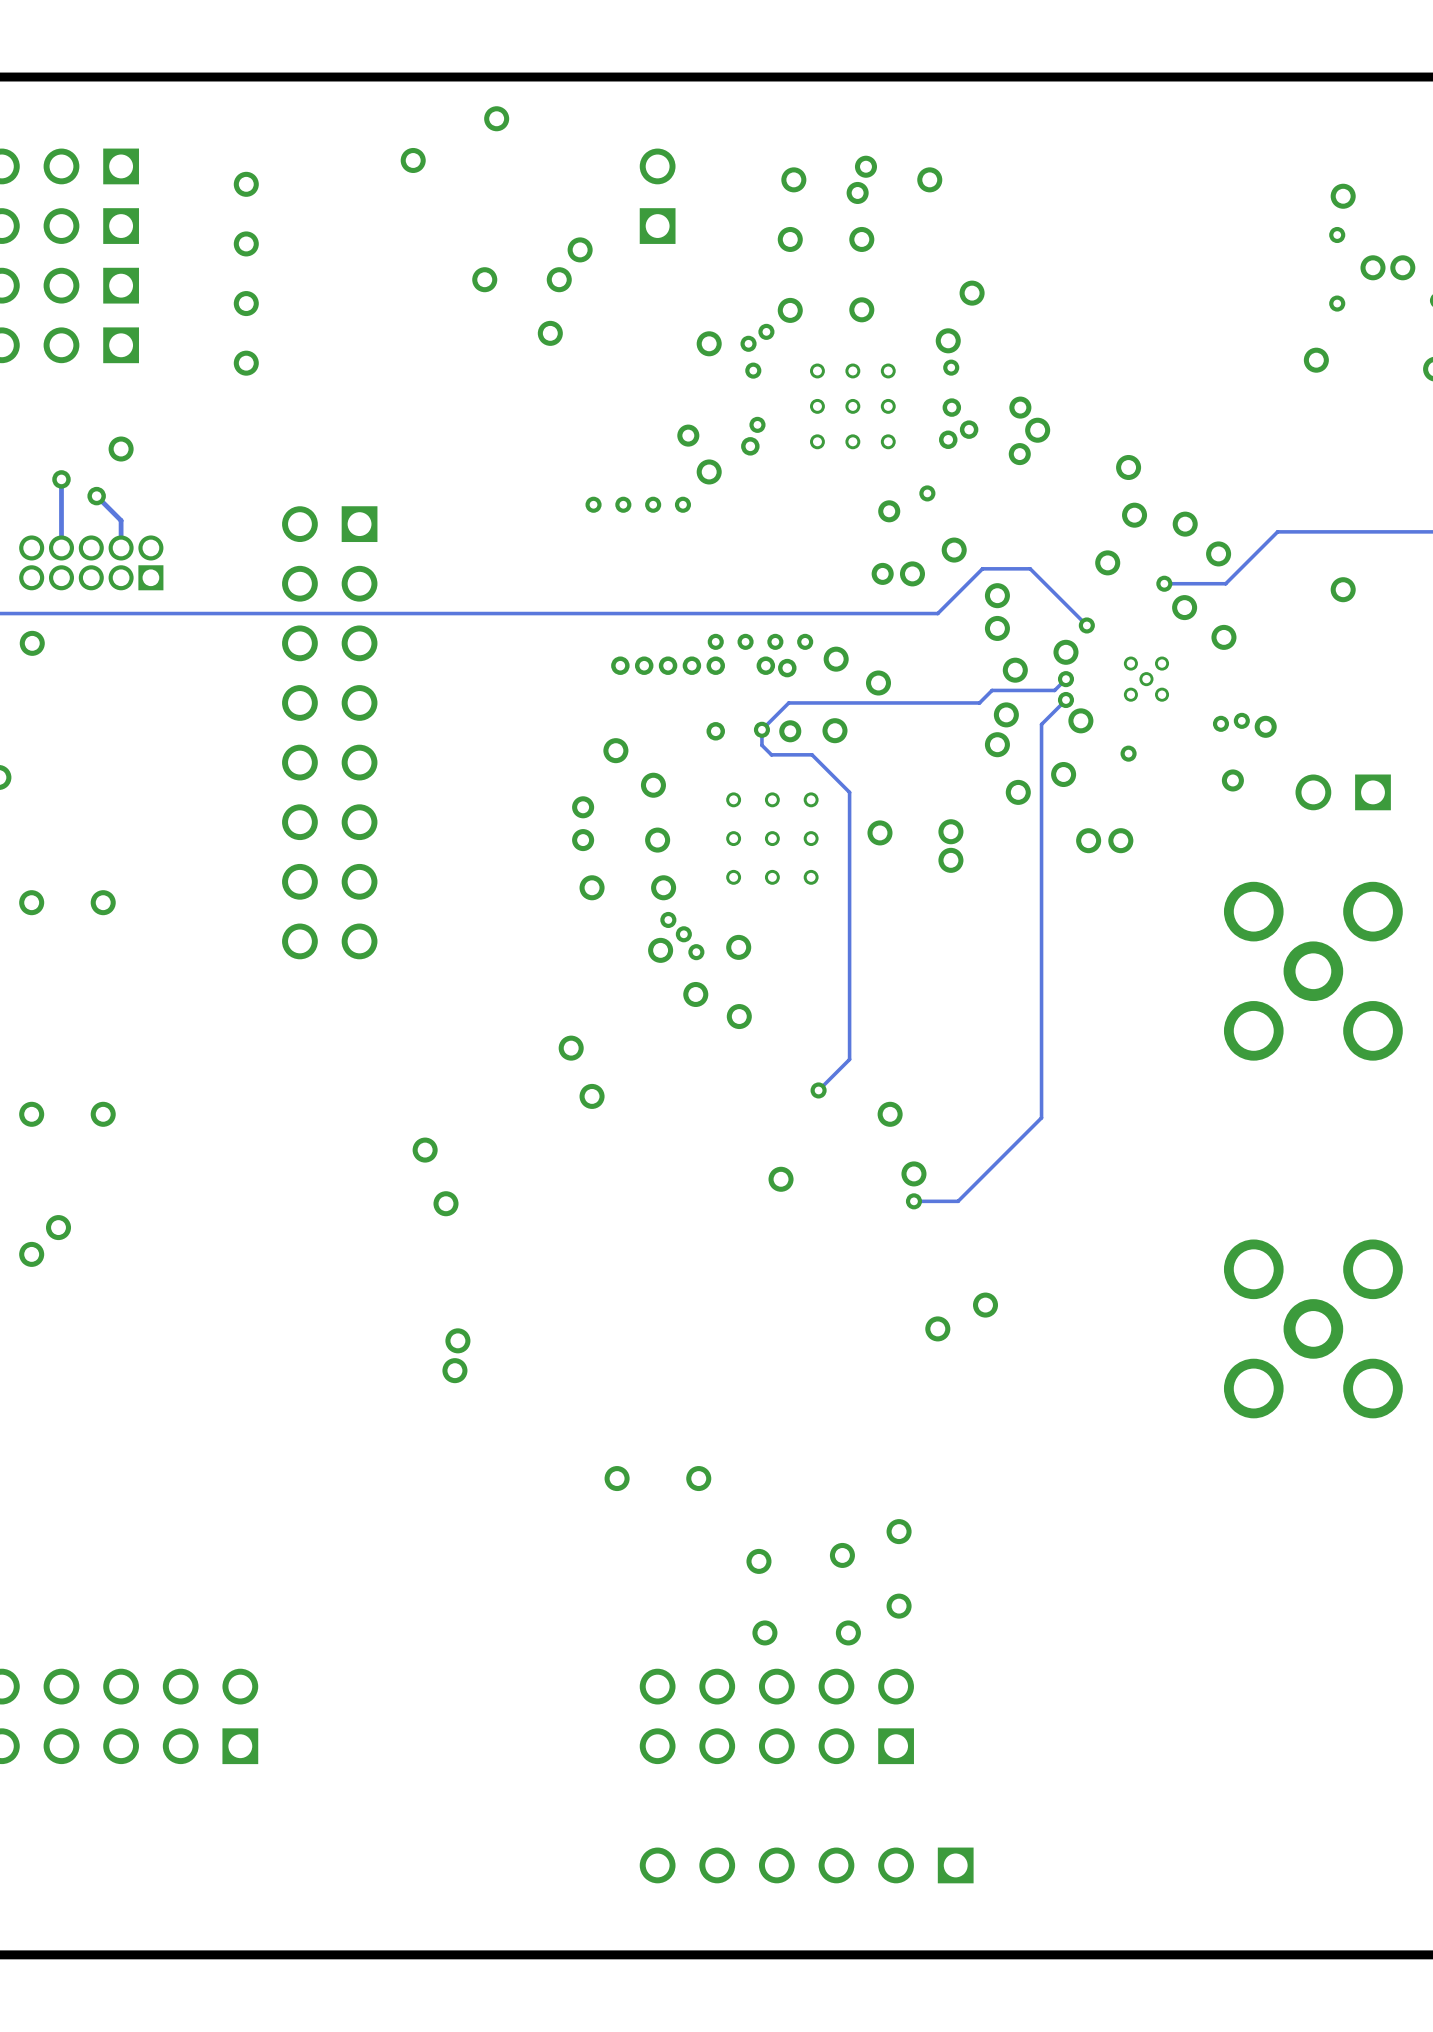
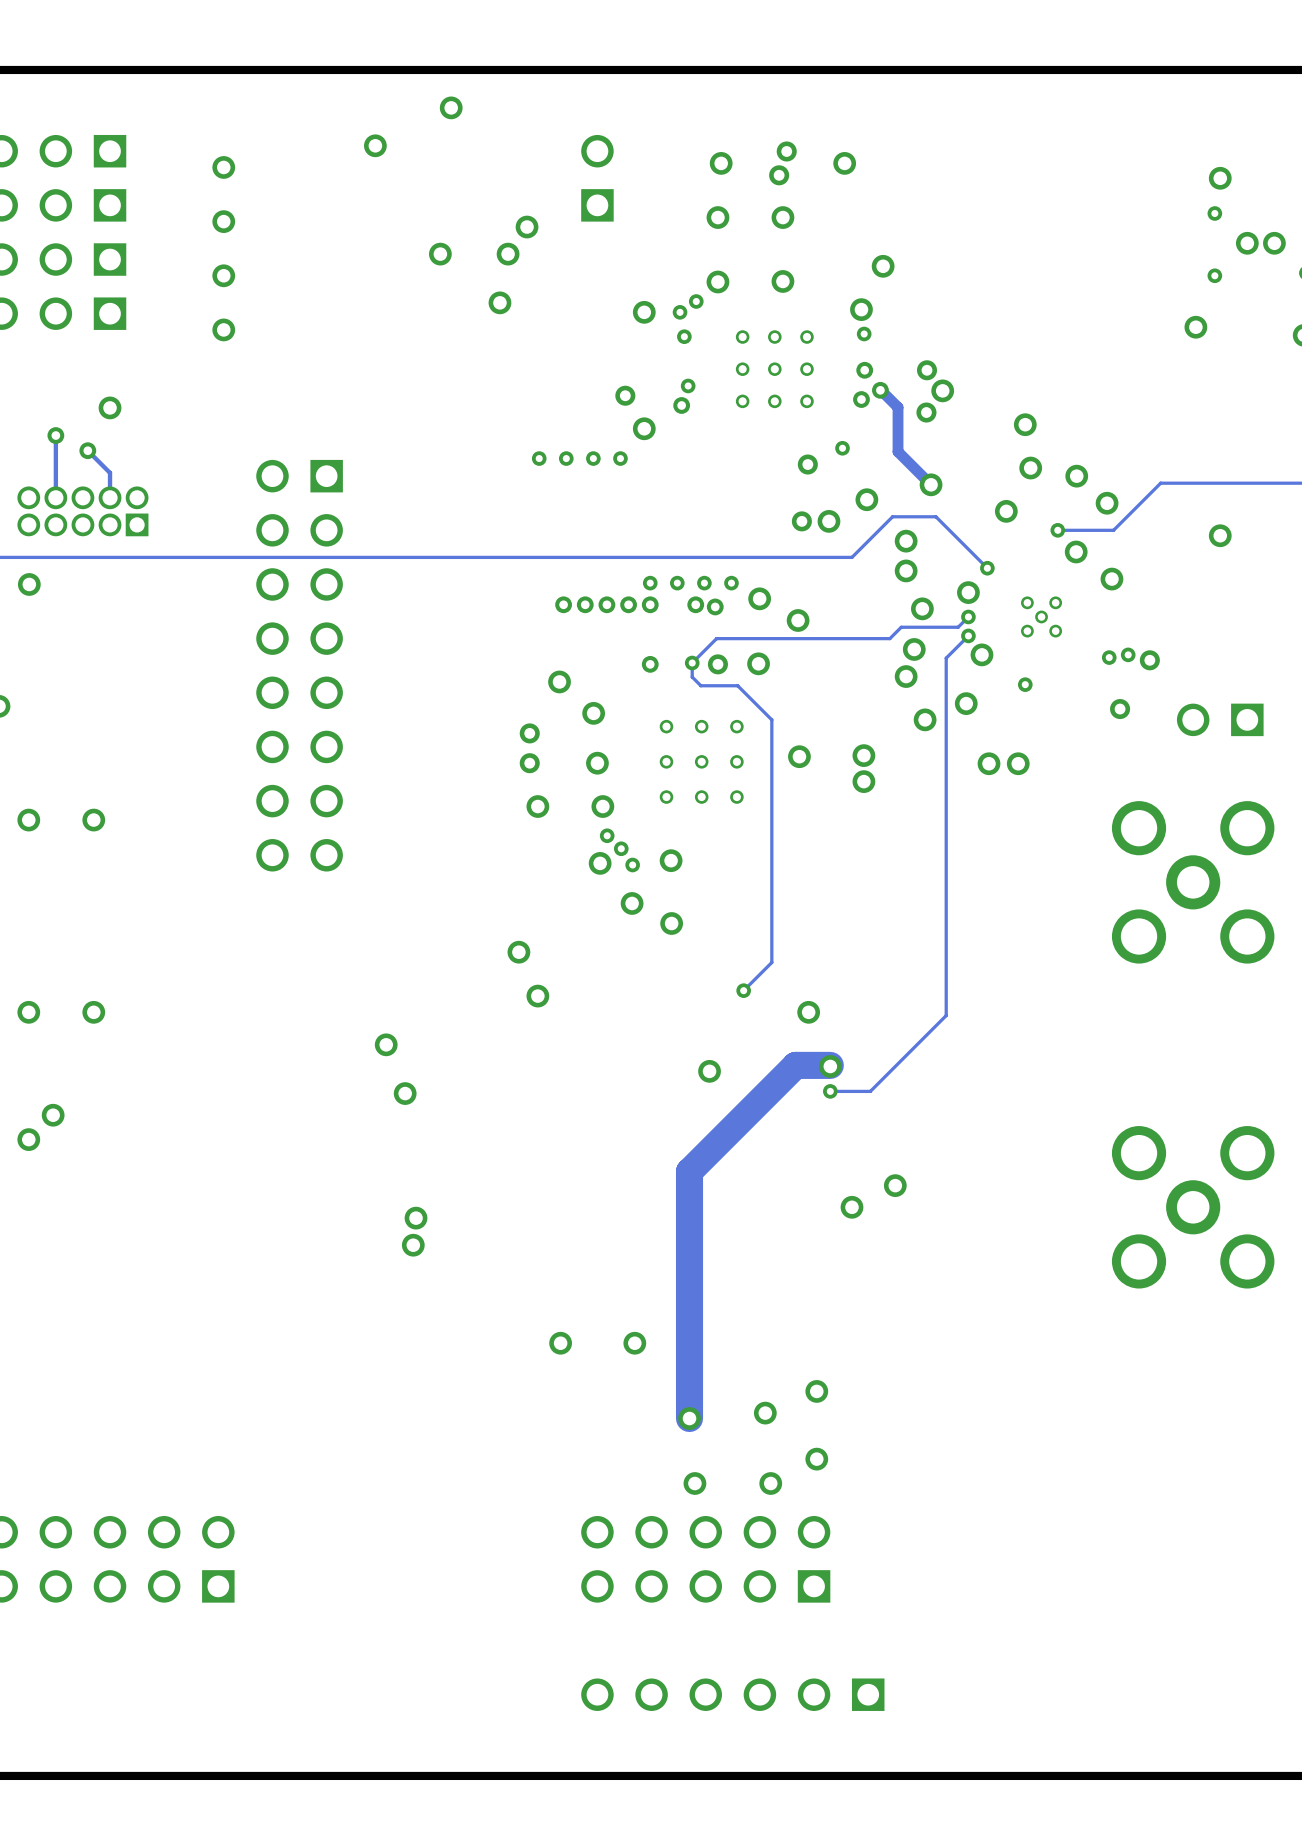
track: none -> (880, 390) (898, 407) (898, 451) (931, 484)
via: none -> (931, 484)
track: none -> (830, 1065) (795, 1065) (689, 1171) (689, 1418)

